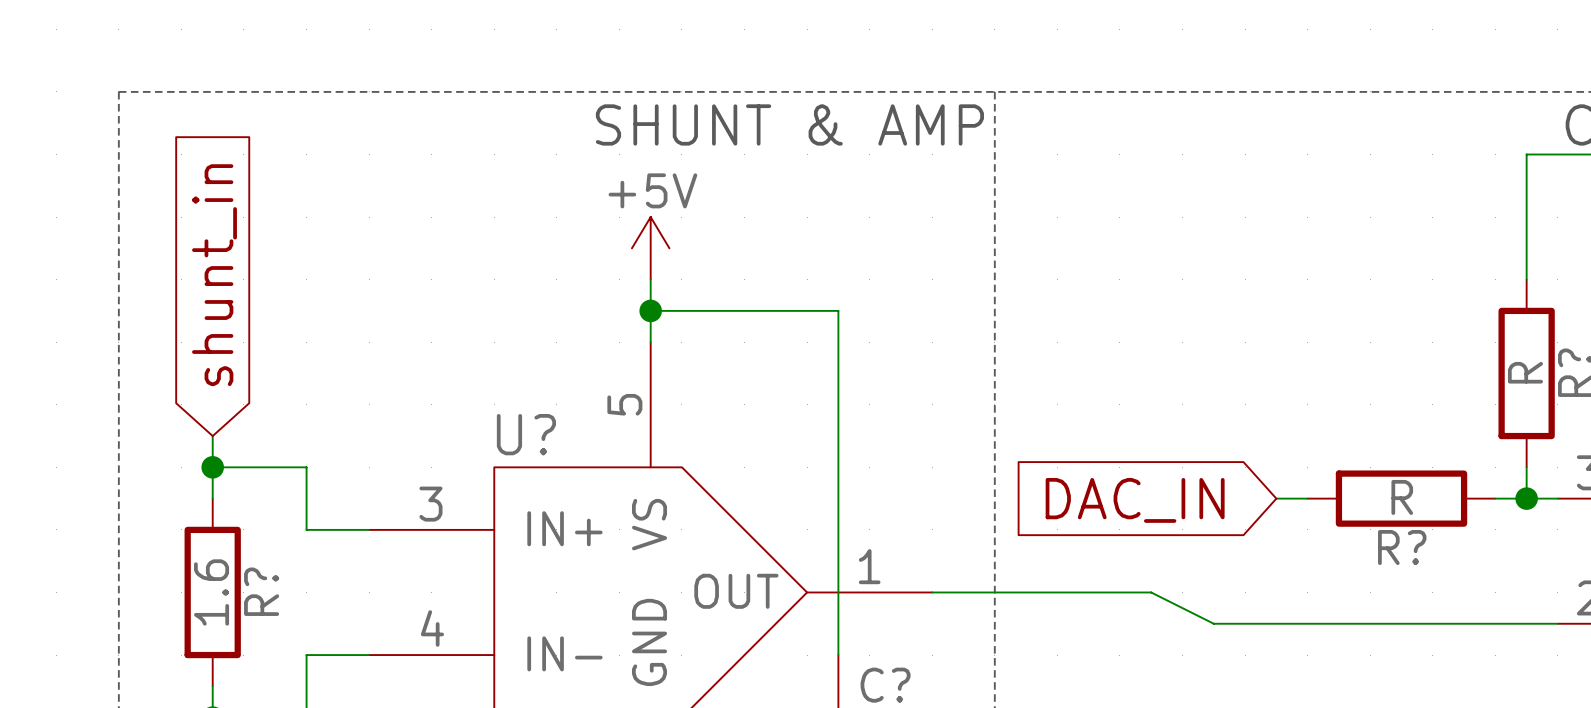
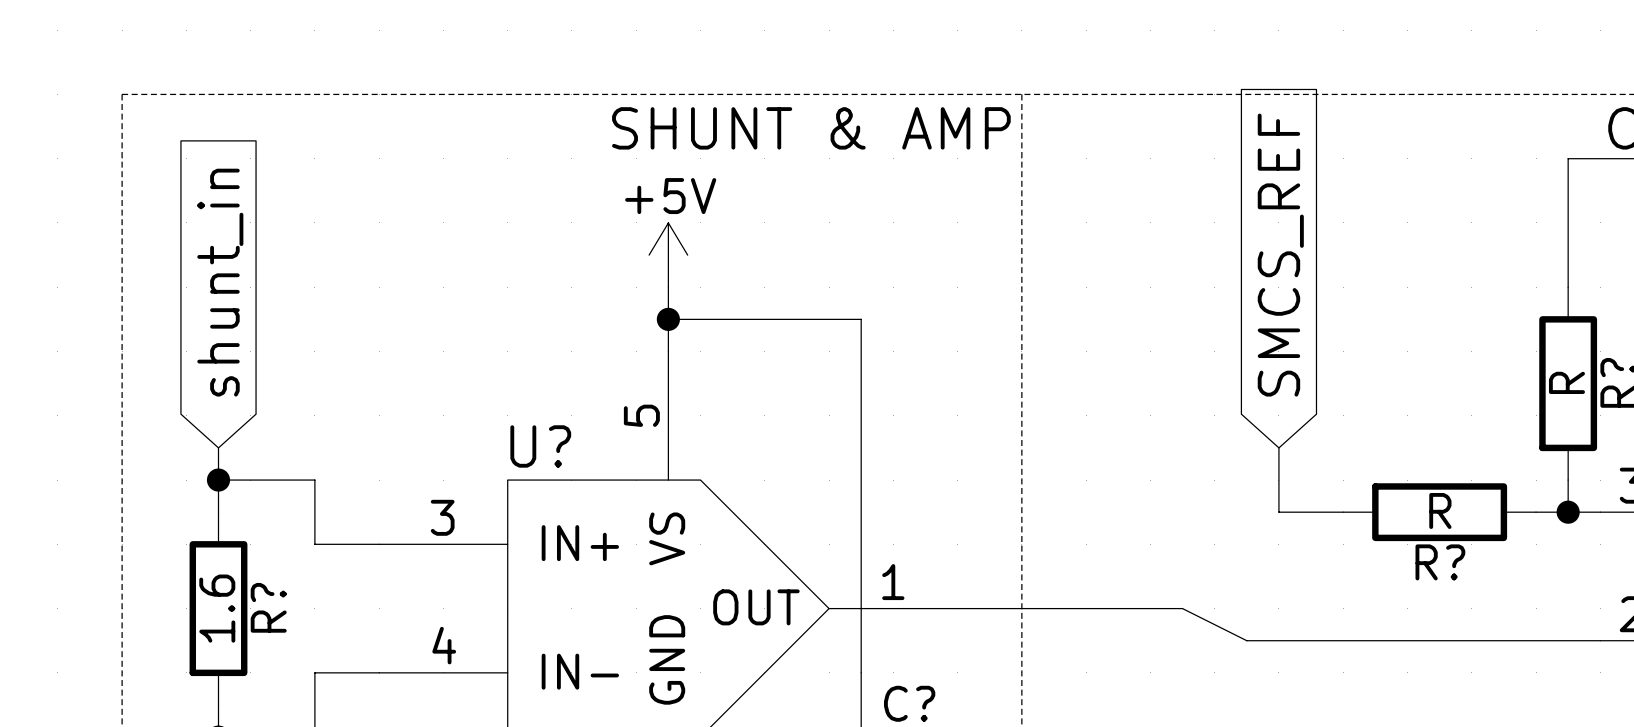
global label: none -> SMCS_REF (1280, 255)
wire: none -> (1278, 447) (1278, 512) (1311, 512)
global label: DAC_IN (1135, 500) -> none

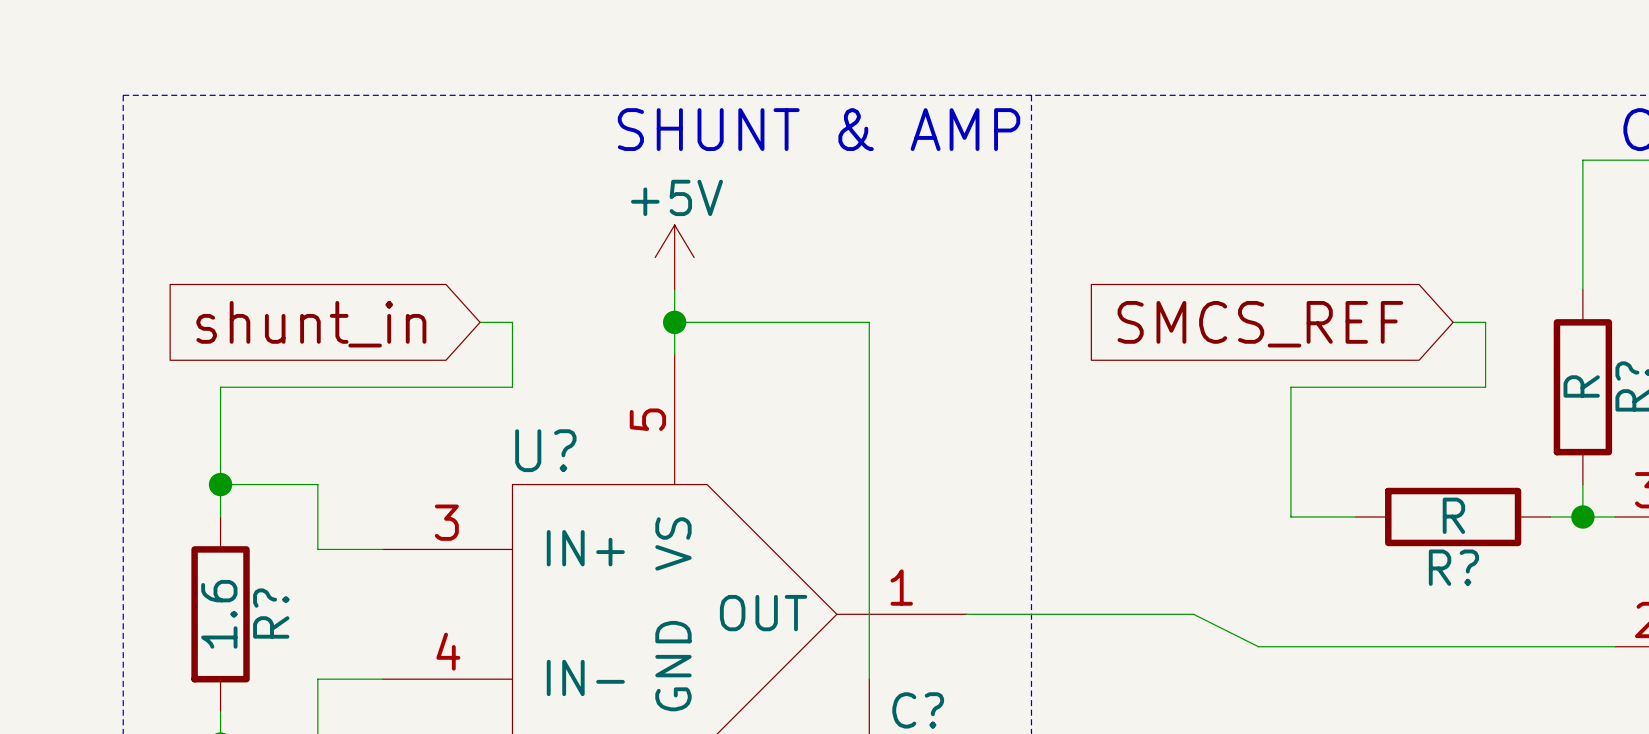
global label rotation: 0° (1280, 255) -> 90° counterclockwise (1260, 324)
global label rotation: 0° (220, 282) -> 90° counterclockwise (311, 324)
wire: none -> (480, 322) (512, 322) (512, 387) (220, 387) (220, 452)
wire: none -> (1453, 322) (1485, 322) (1485, 387) (1290, 387) (1290, 452)

